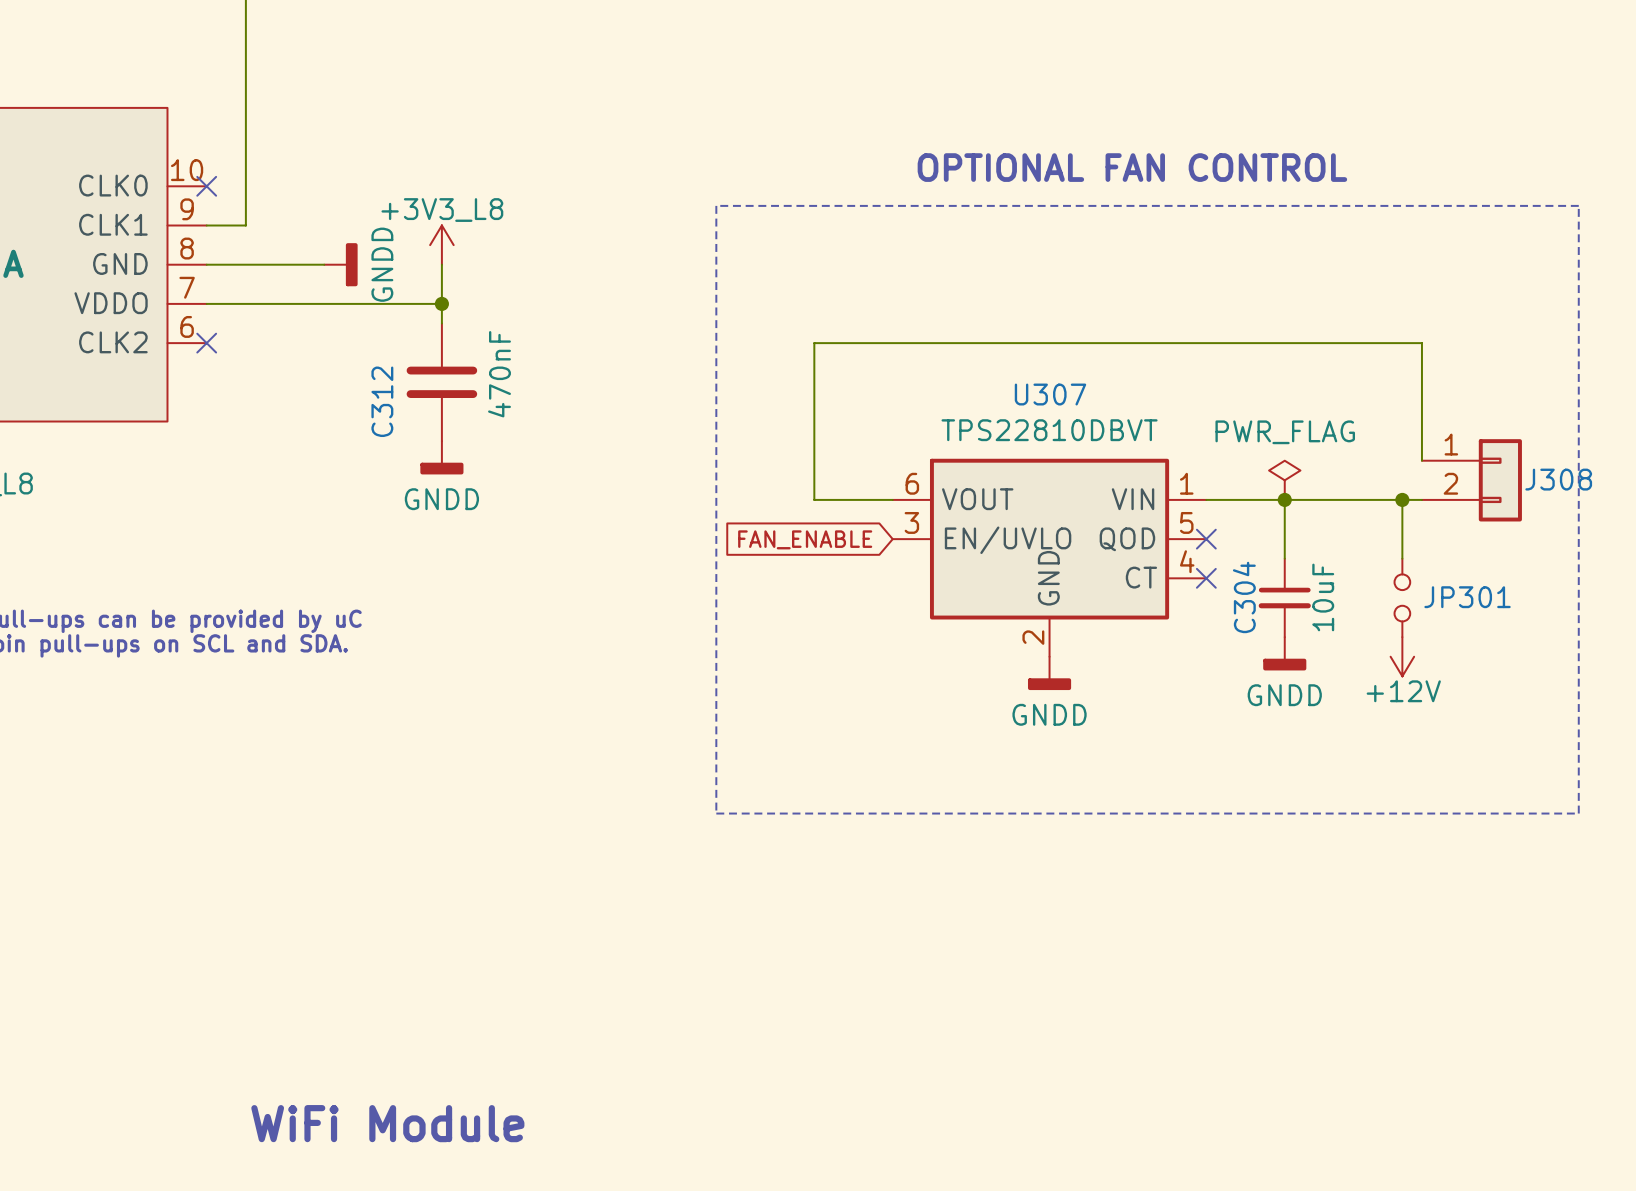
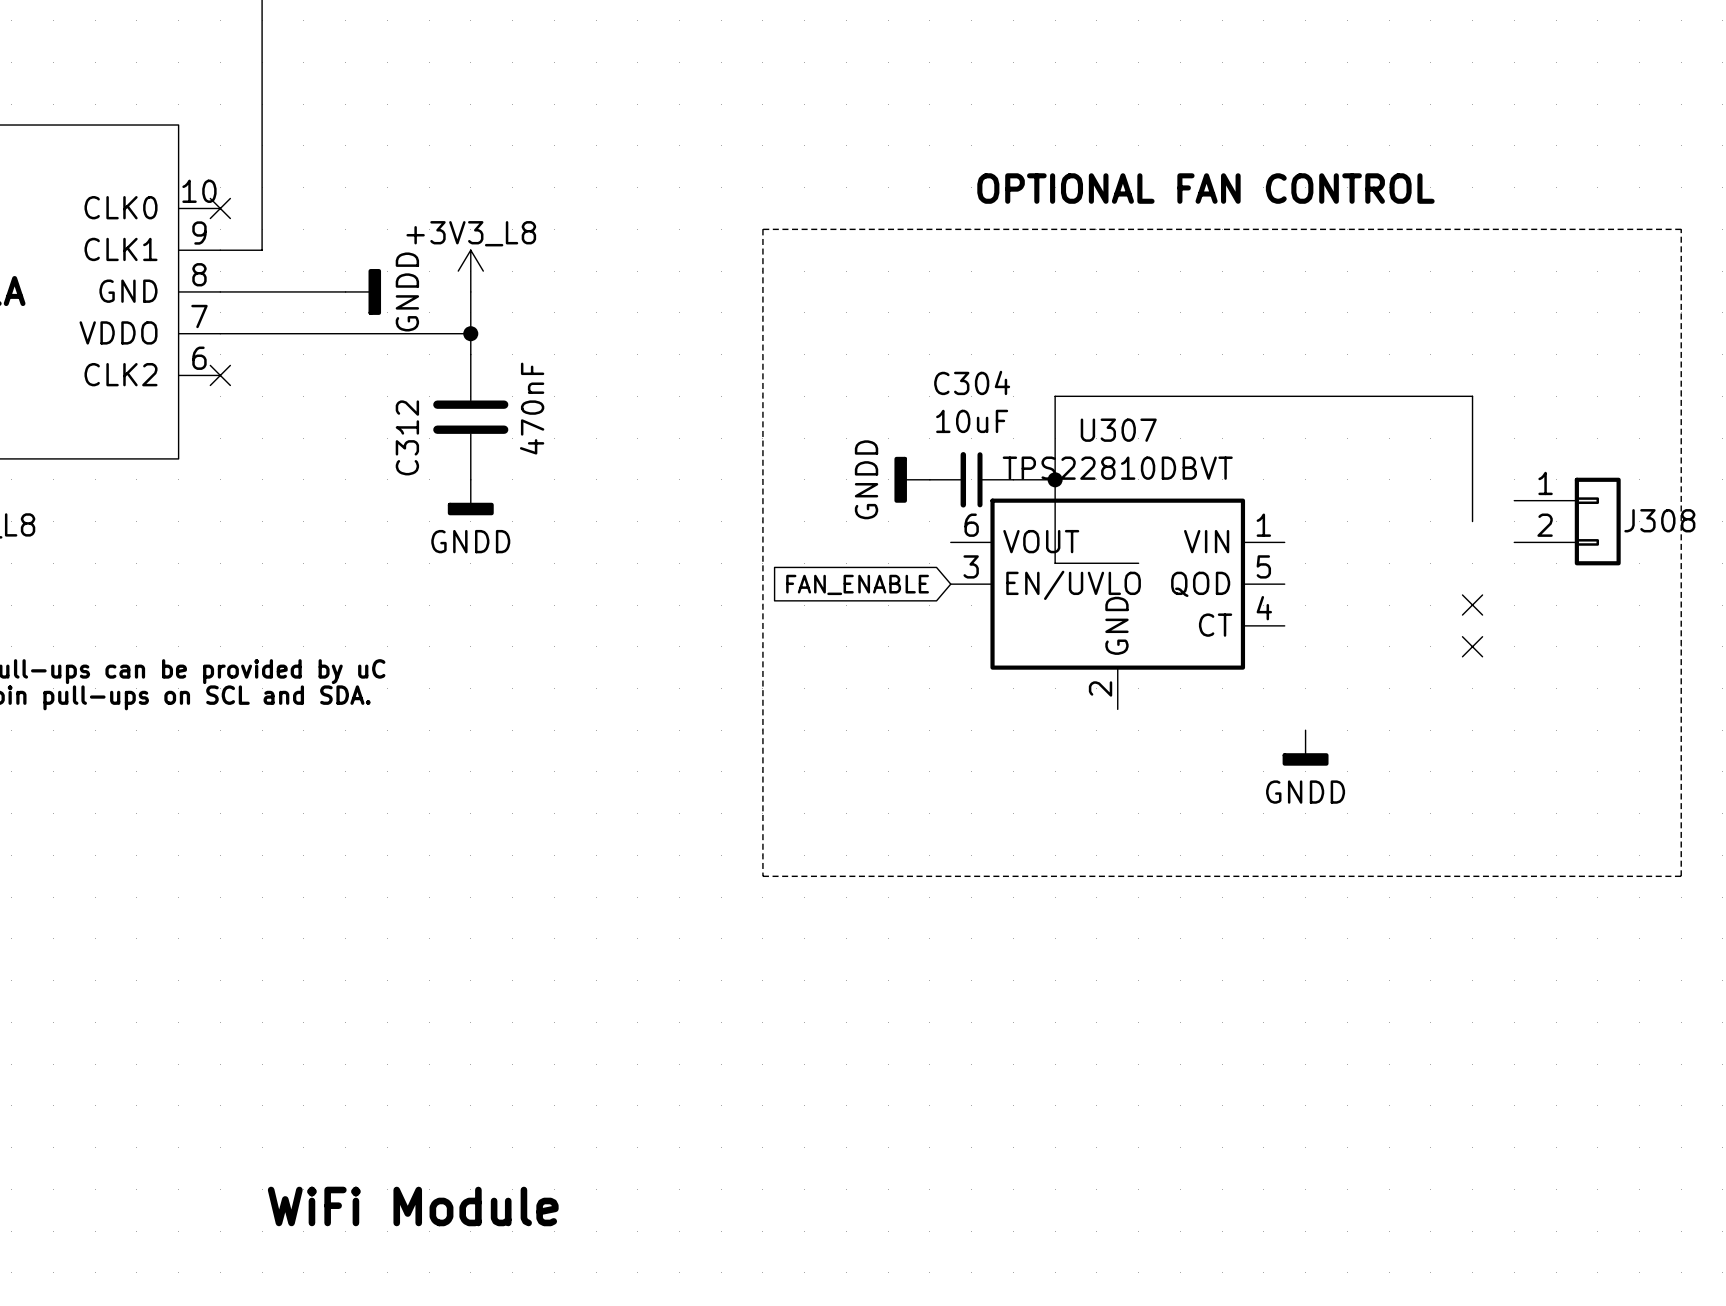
power symbol: none -> GNDD (912, 479)
wire: none -> (1013, 479) (1055, 479)
junction: none -> (1055, 479)
wire: (1421, 460) (1421, 343) (814, 343) (814, 499) (892, 499) -> none
power symbol: PWR_FLAG (1284, 480) -> none
wire: none -> (1472, 521) (1472, 396) (1055, 396) (1055, 563) (1138, 563)
wire: (1206, 499) (1421, 499) -> none
wire: (1284, 499) (1284, 558) -> none
junction: (1284, 499) -> none
wire: (1402, 499) (1402, 558) -> none
junction: (1402, 499) -> none
no-connect mark: (1206, 539) -> none
no-connect mark: none -> (1472, 605)
no-connect mark: (1206, 578) -> none
C304 name position: C304 (1244, 597) -> C304 (972, 382)
C304 position: (1284, 597) -> (971, 479)
C304 value position: 10uF (1323, 597) -> 10uF (972, 421)
no-connect mark: none -> (1472, 646)
JP301: (1402, 597) -> none
C304 rotation: 0° (1284, 598) -> 90° clockwise (971, 479)
power symbol position: GNDD (1284, 653) -> GNDD (1305, 747)
power symbol: +12V (1402, 656) -> none
power symbol: GNDD (1049, 673) -> none

